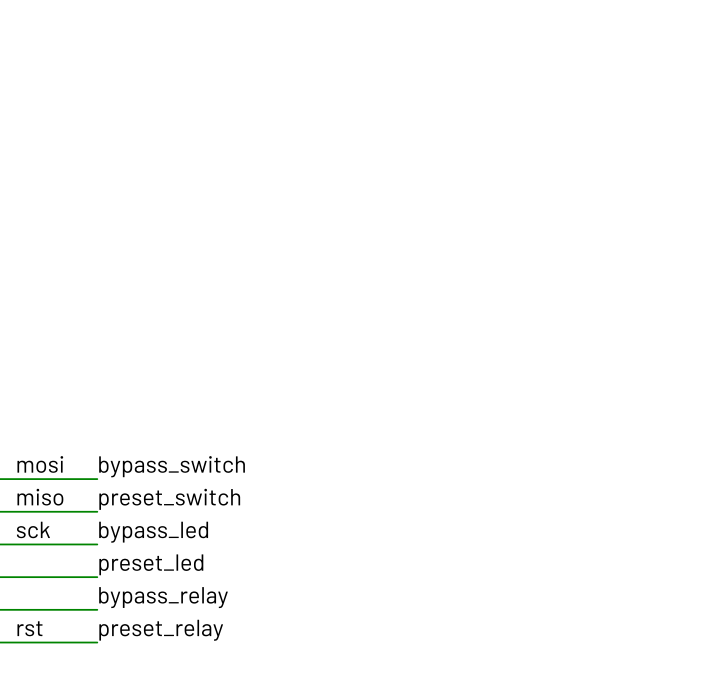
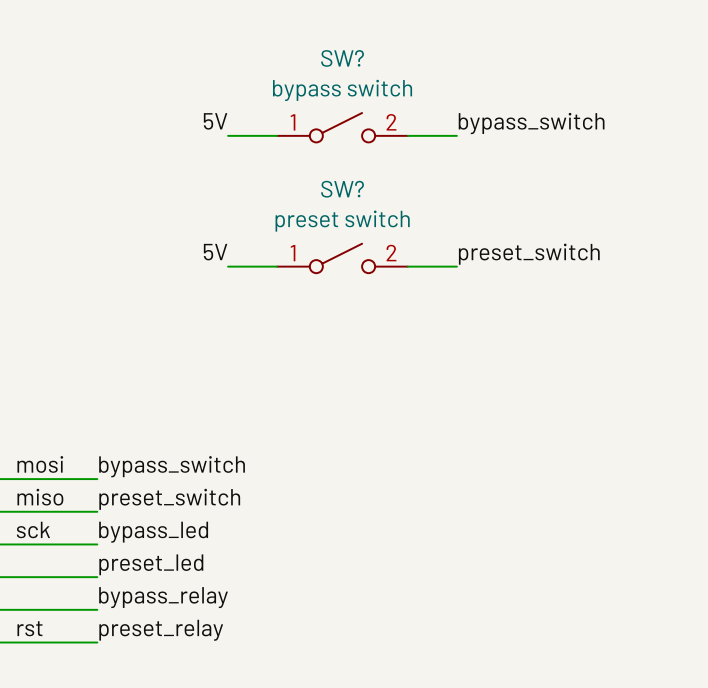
label: none -> 5V (215, 121)
label: none -> bypass_switch (531, 123)
SW?: none -> bypass switch (342, 127)
wire: none -> (228, 135) (277, 135)
wire: none -> (407, 135) (456, 135)
label: none -> 5V (215, 252)
label: none -> preset_switch (529, 254)
SW?: none -> preset switch (342, 258)
wire: none -> (228, 266) (277, 266)
wire: none -> (407, 266) (456, 266)

